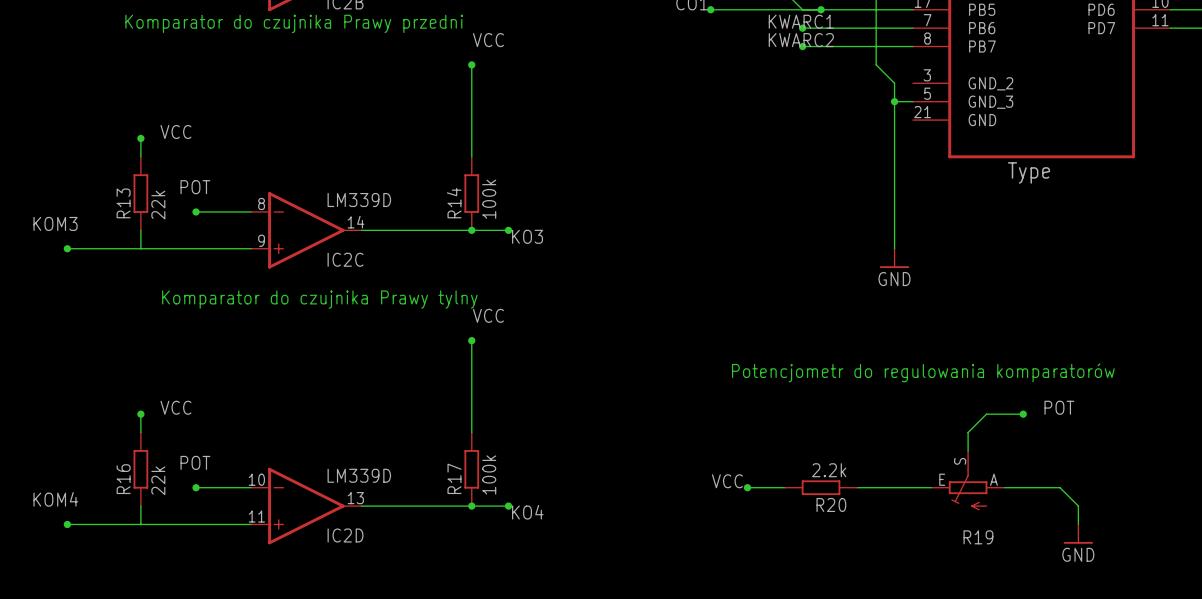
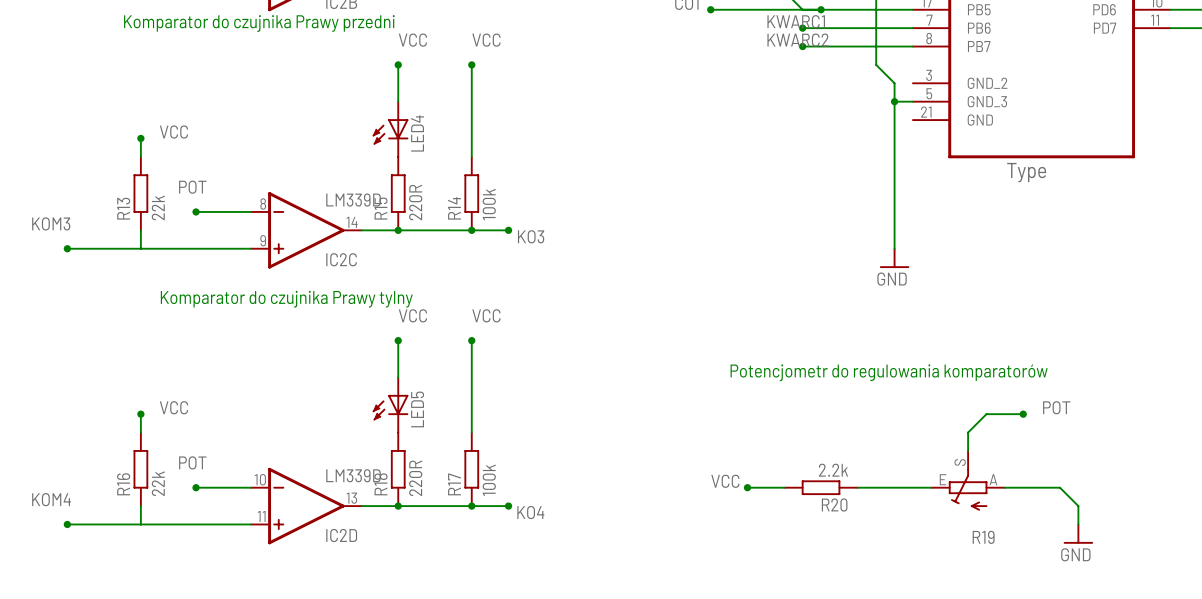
label: none -> VCC (412, 40)
wire: none -> (398, 64) (398, 101)
junction: none -> (398, 64)
LED4: none -> (390, 129)
R15: none -> 220R (398, 193)
junction: none -> (398, 230)
label: none -> VCC (412, 315)
wire: none -> (398, 340) (398, 377)
junction: none -> (398, 340)
LED5: none -> (390, 404)
R18: none -> 220R (398, 469)
junction: none -> (398, 506)

